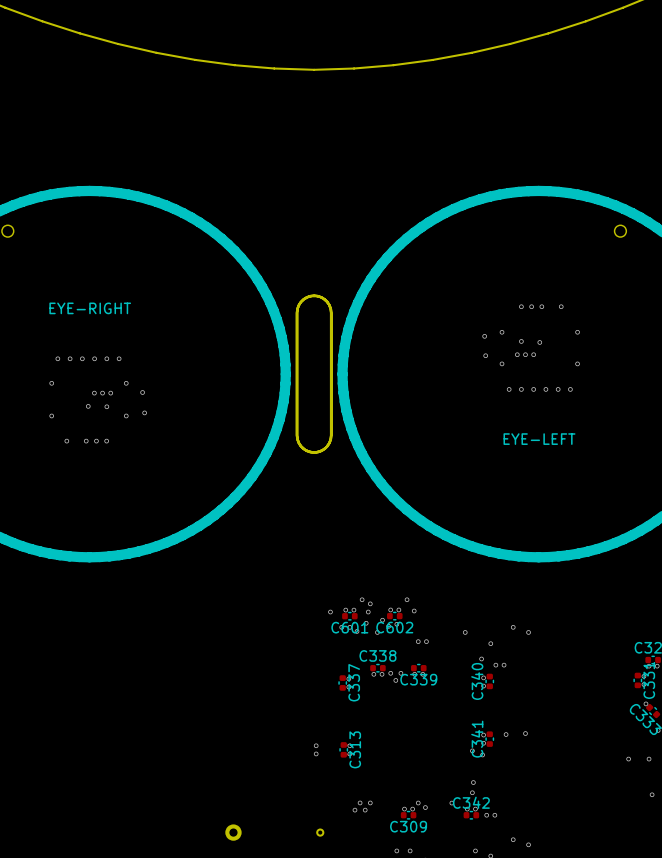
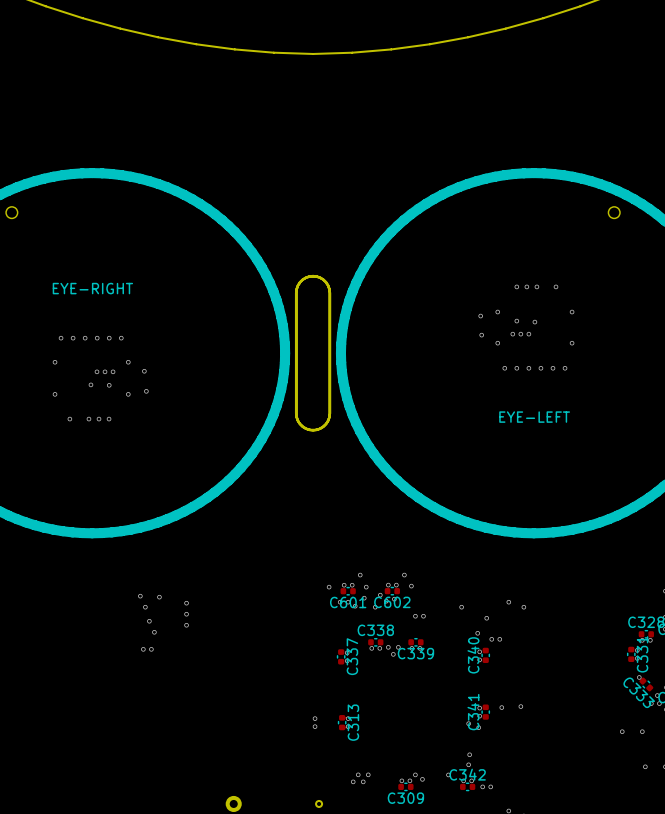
via: (370, 603) -> none
via: none -> (140, 596)
via: none -> (159, 597)
via: none -> (186, 603)
via: none -> (145, 607)
via: none -> (186, 614)
via: none -> (149, 621)
via: none -> (186, 625)
via: none -> (154, 632)
via: none -> (143, 649)
via: none -> (151, 649)

